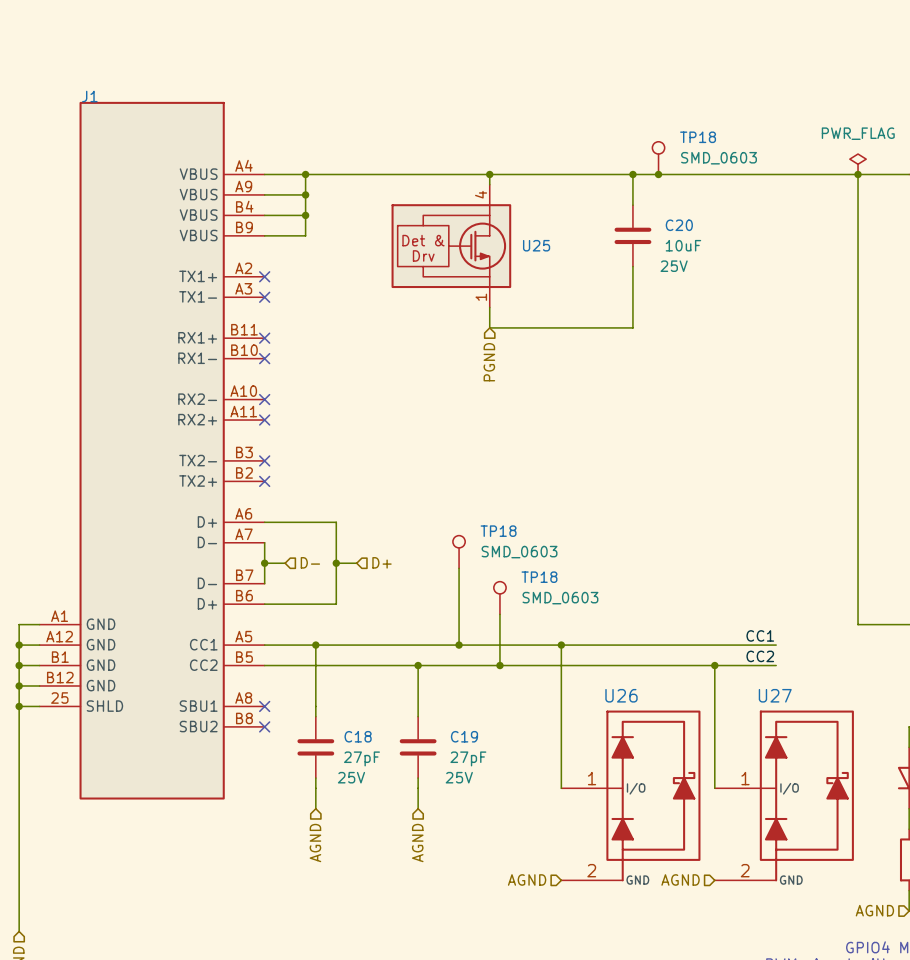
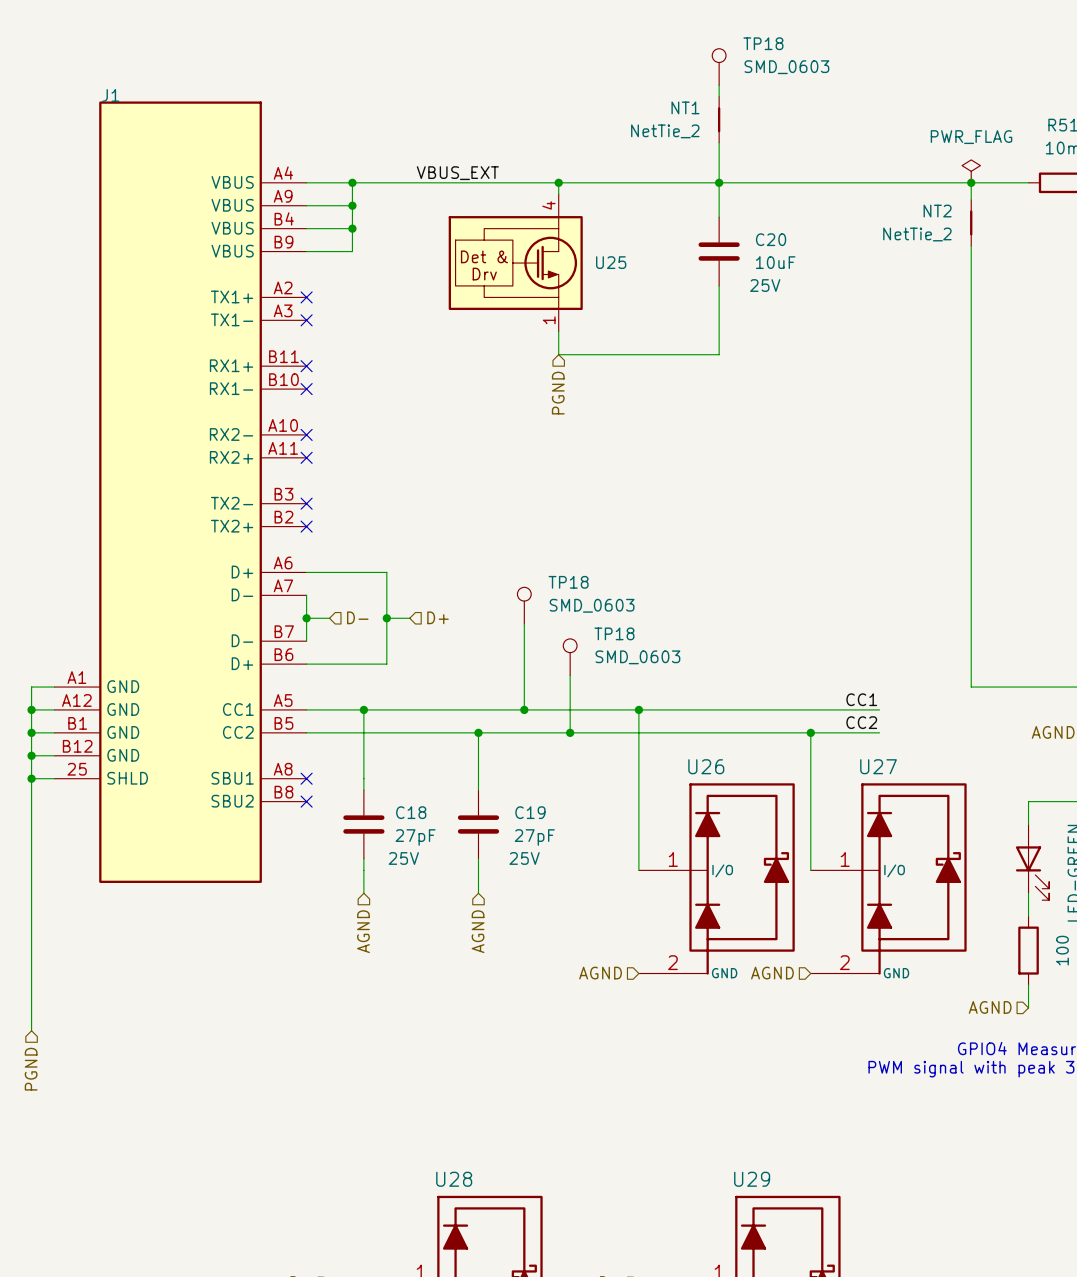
wire: none -> (719, 85) (719, 96)
NT1: none -> NetTie_2 (719, 119)
wire: none -> (719, 142) (719, 182)
TP18 position: (658, 158) -> (719, 67)
label: none -> VBUS_EXT (457, 173)
junction: (658, 174) -> none
NT2: none -> NetTie_2 (971, 222)

